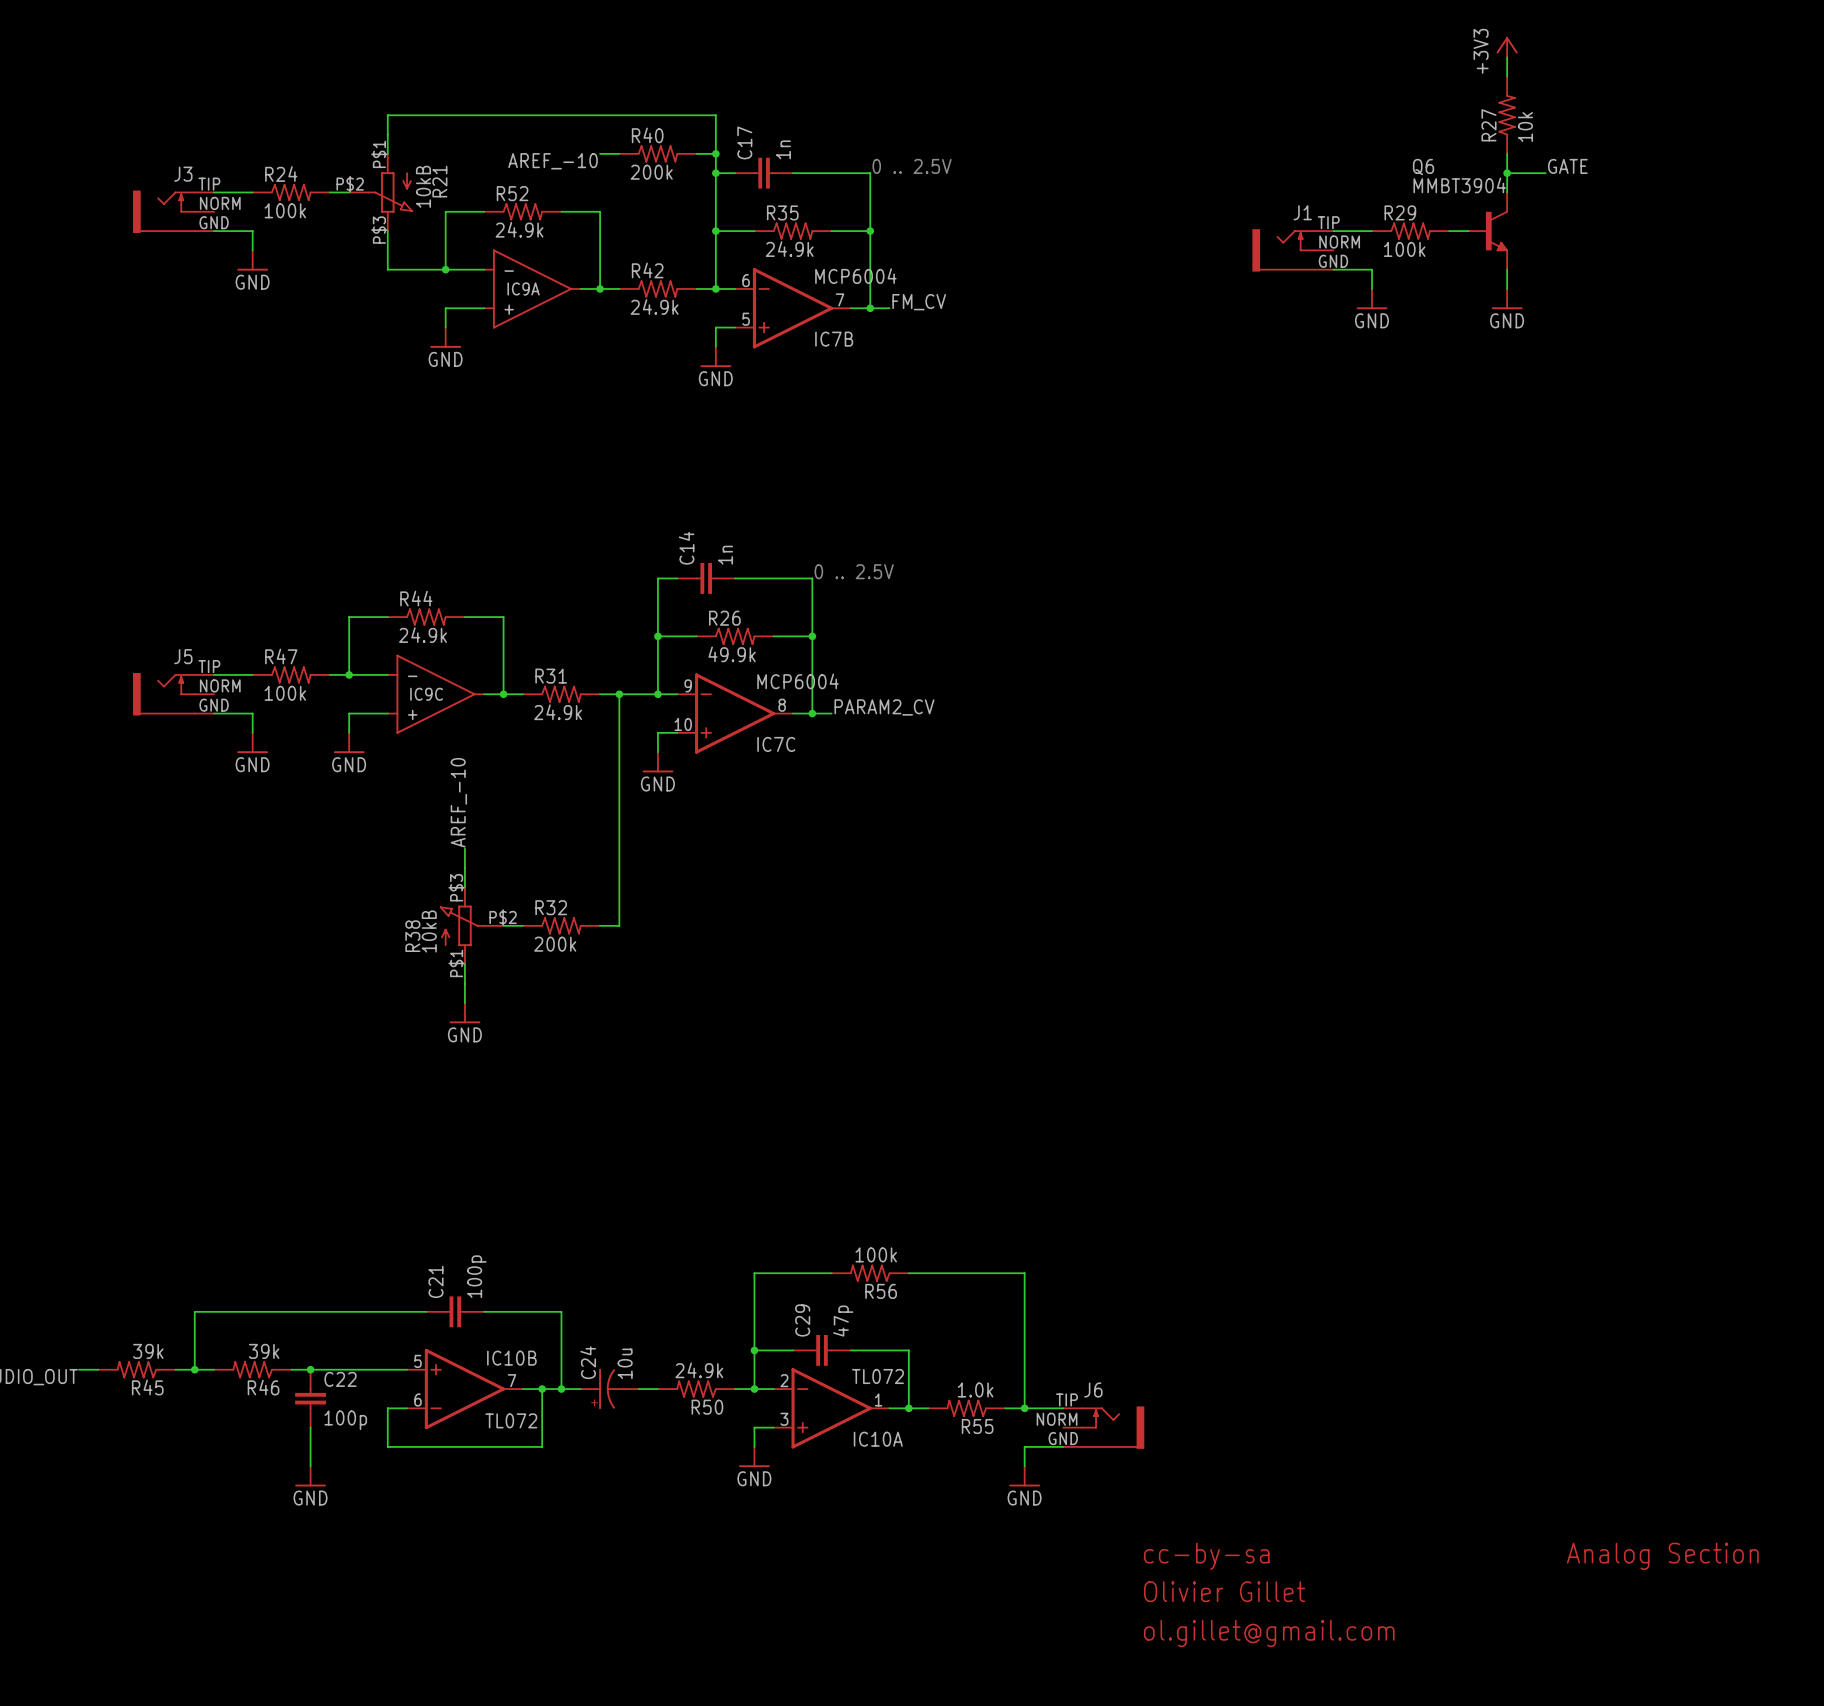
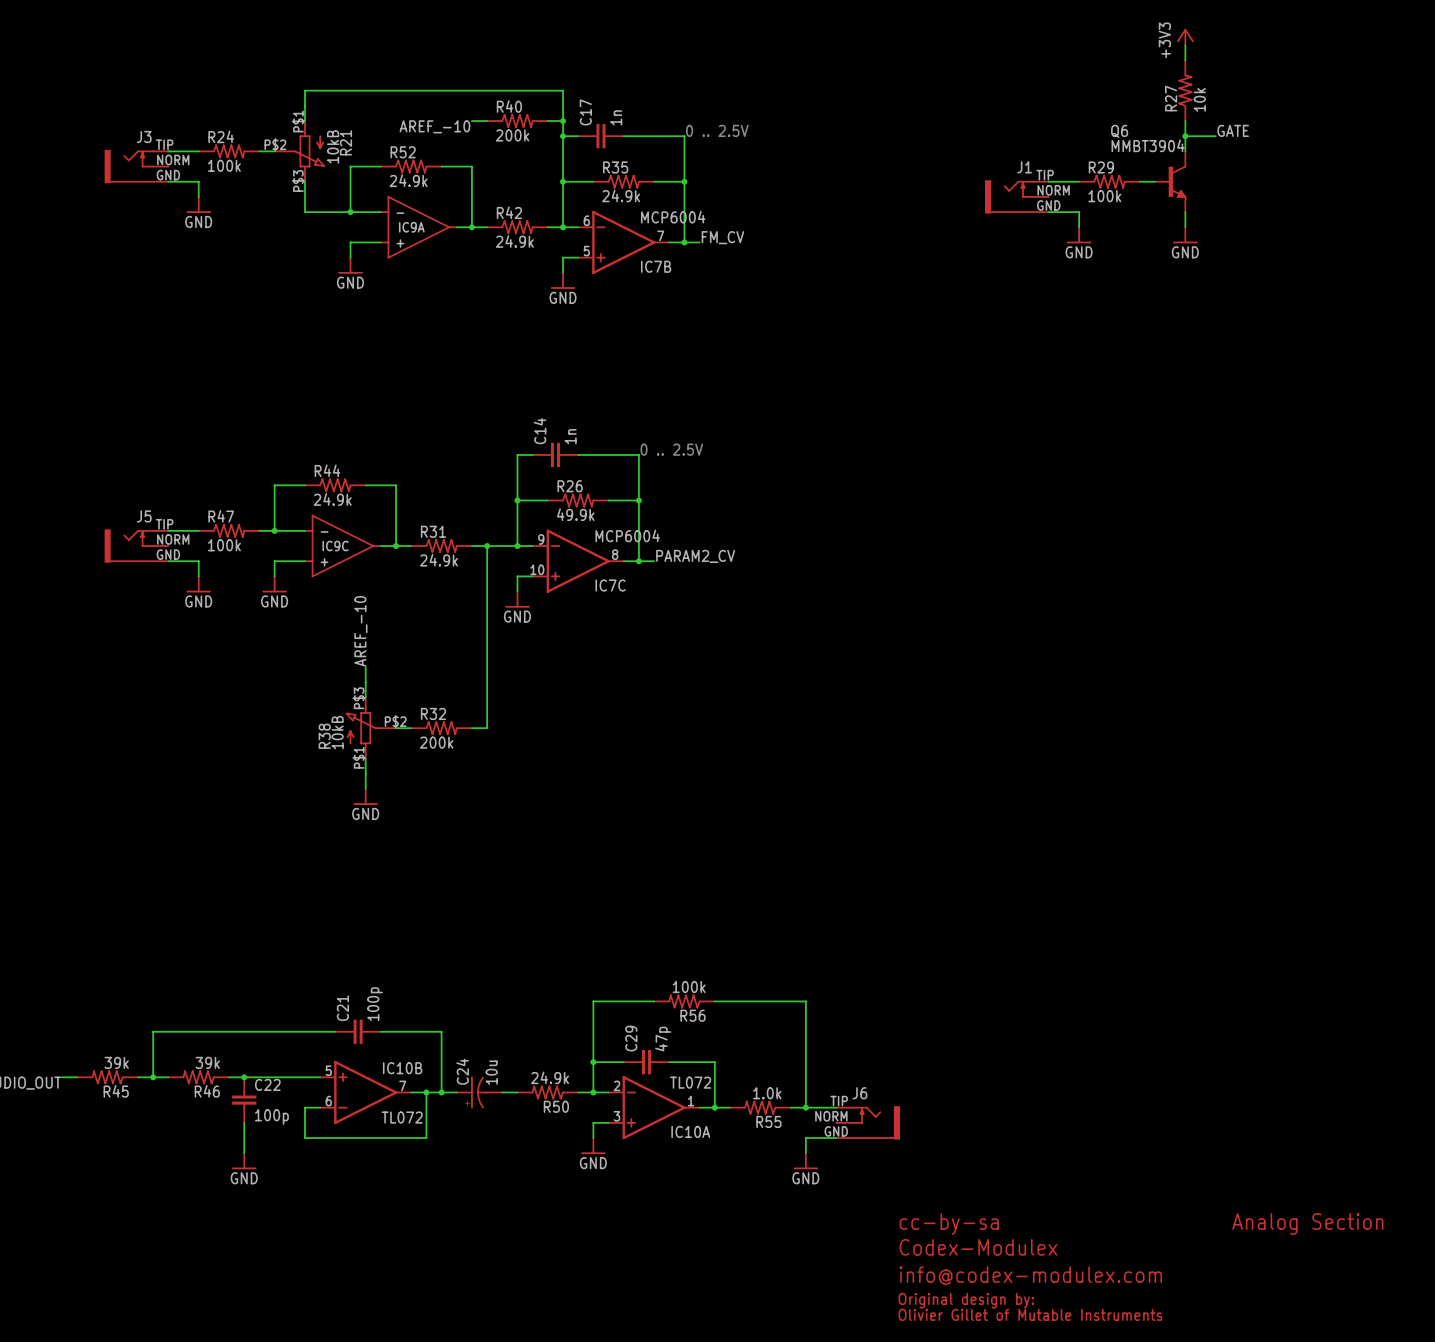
text: Olivier Gillet (1224, 1591) -> Codex-Modulex (978, 1247)
text: none -> info@codex-modulex.com (1030, 1275)
text: ol.gillet@gmail.com (1269, 1633) -> none
text: none -> Original design by: (966, 1300)
text: none -> Olivier Gillet of Mutable Instruments (1030, 1314)

